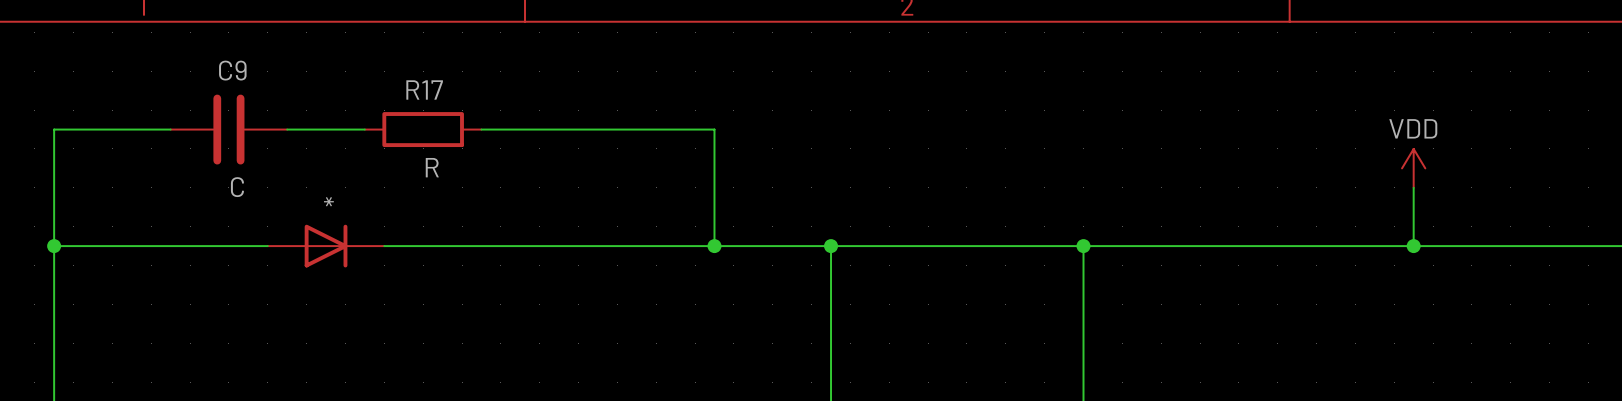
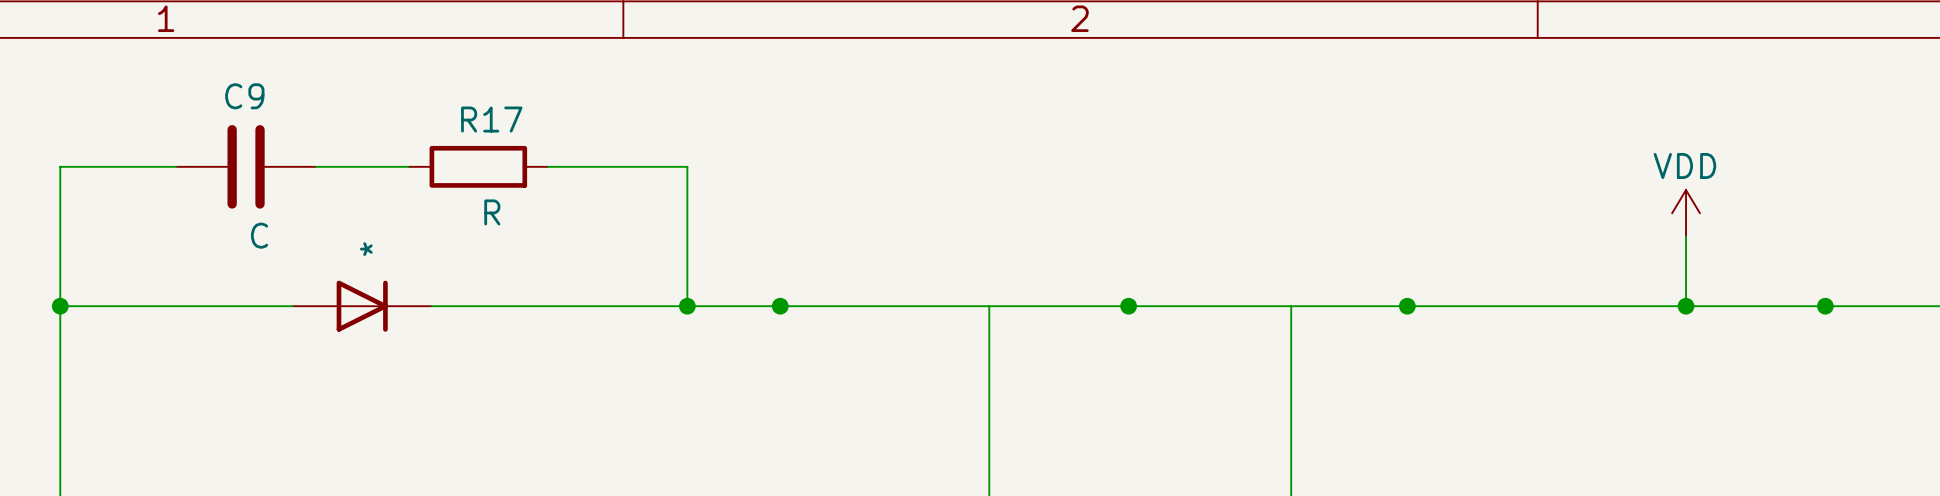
C9 position: (228, 129) -> (246, 166)
R17 position: (423, 129) -> (478, 166)
wire: (578, 129) (714, 129) (714, 246) -> (687, 166) (687, 306)
part position: (326, 246) -> (362, 306)
junction: none -> (687, 306)
junction position: (714, 246) -> (780, 306)
junction: (831, 246) -> none
junction: none -> (1128, 306)
junction: (1083, 246) -> none
junction: none -> (1407, 306)
junction: none -> (1825, 306)

